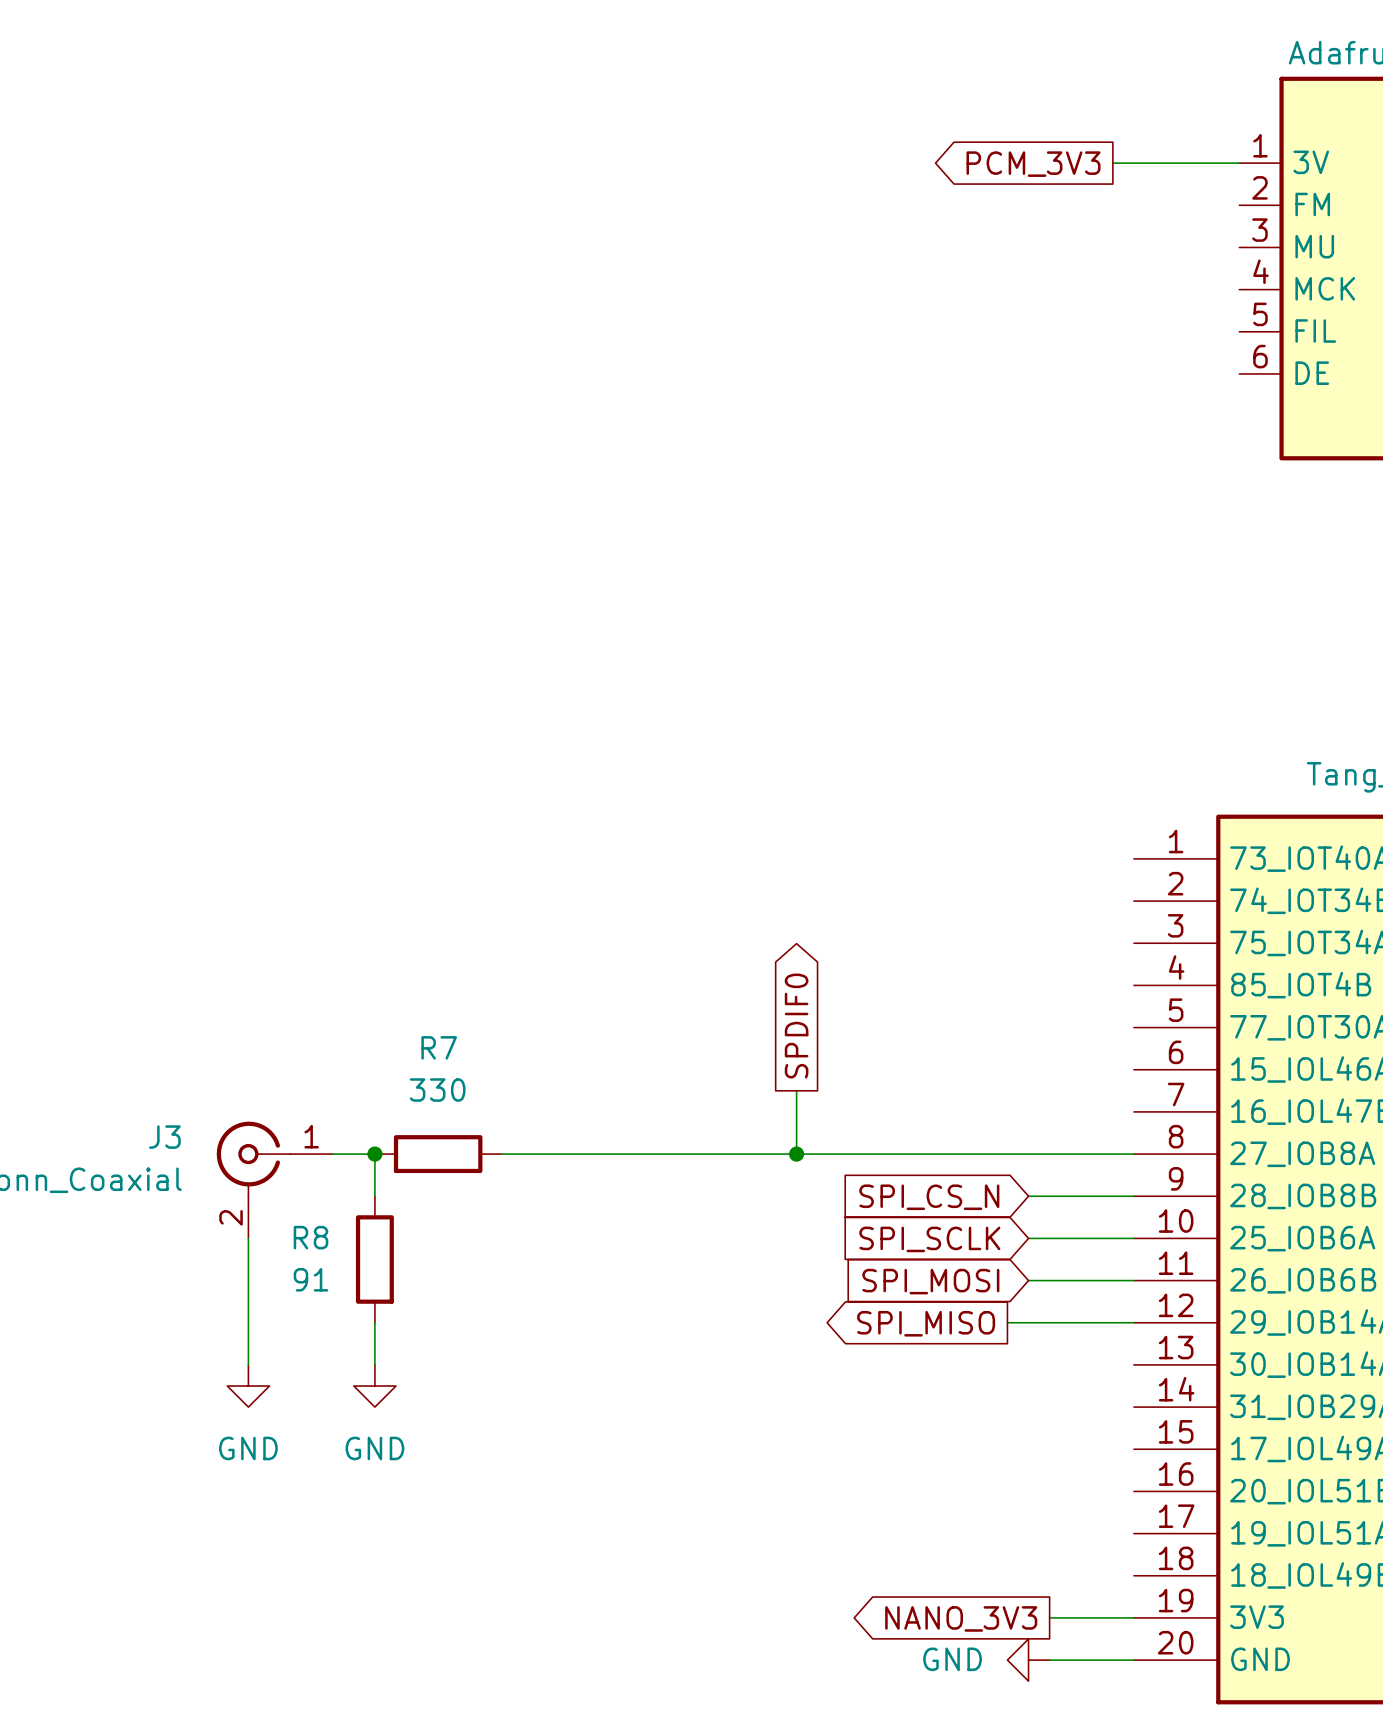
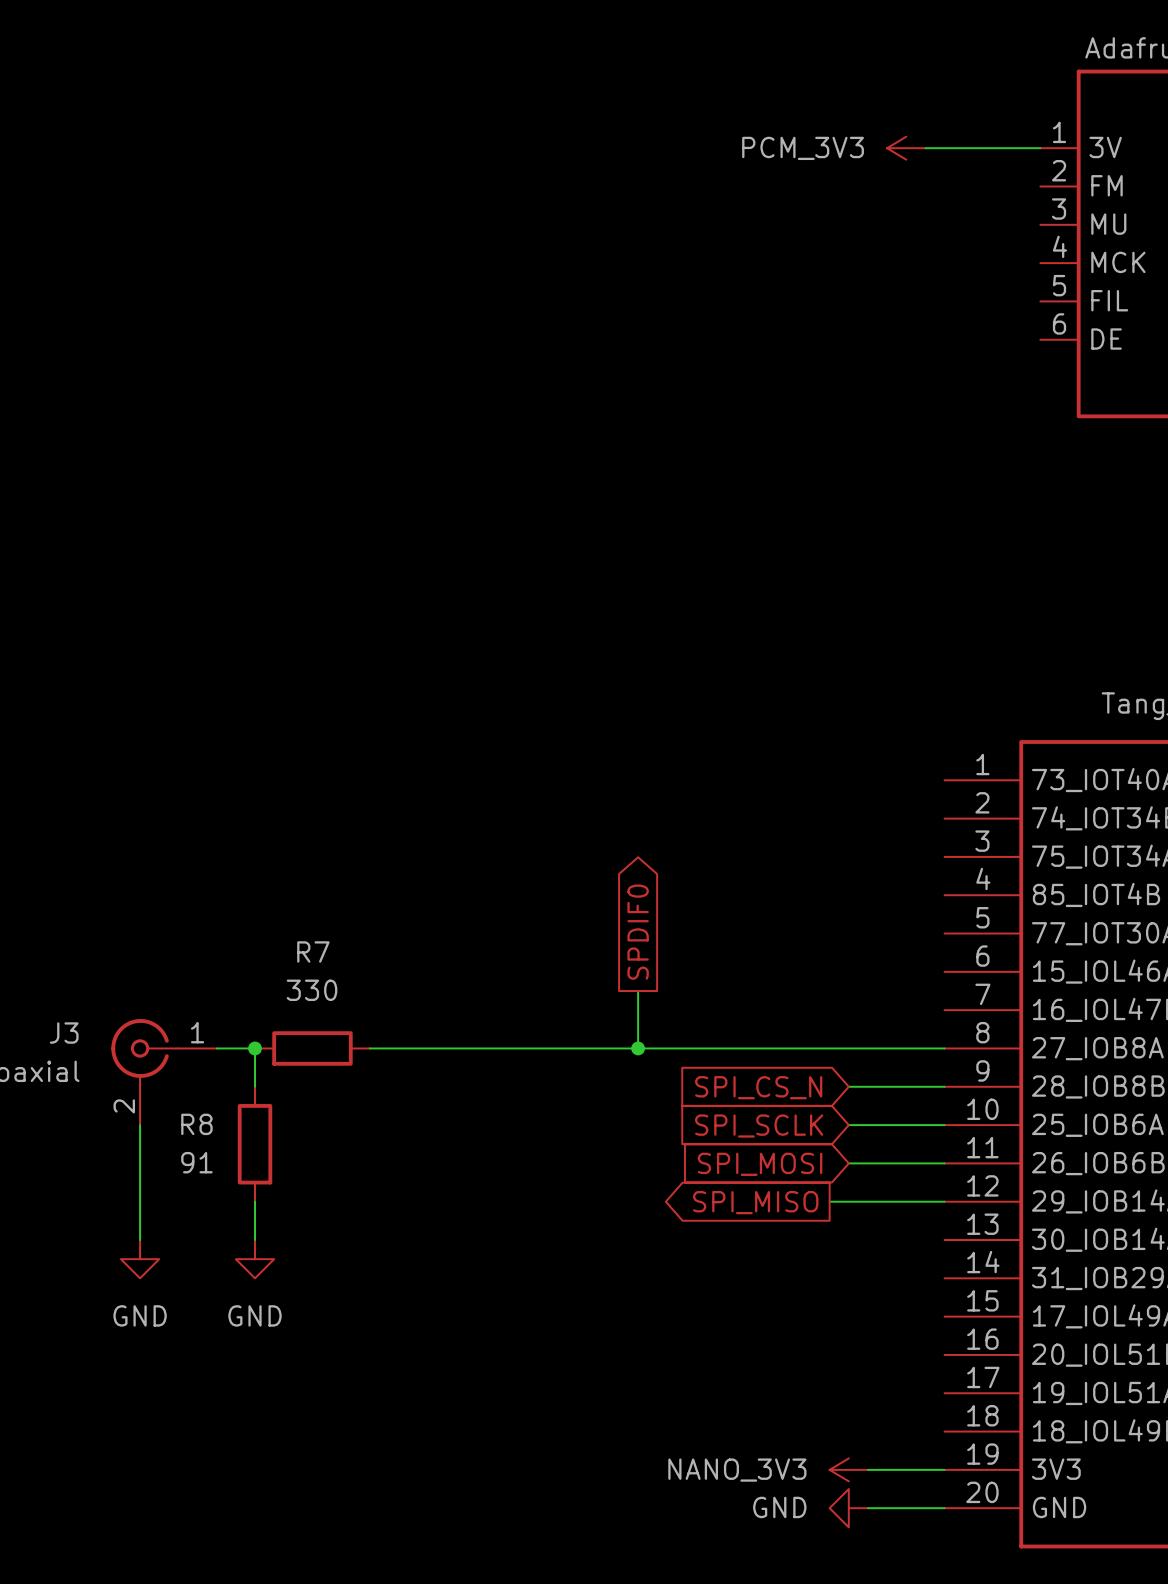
power symbol: none -> PCM_3V3 (906, 148)
global label: PCM_3V3 (1033, 164) -> none
power symbol: none -> NANO_3V3 (848, 1469)
global label: NANO_3V3 (961, 1618) -> none

